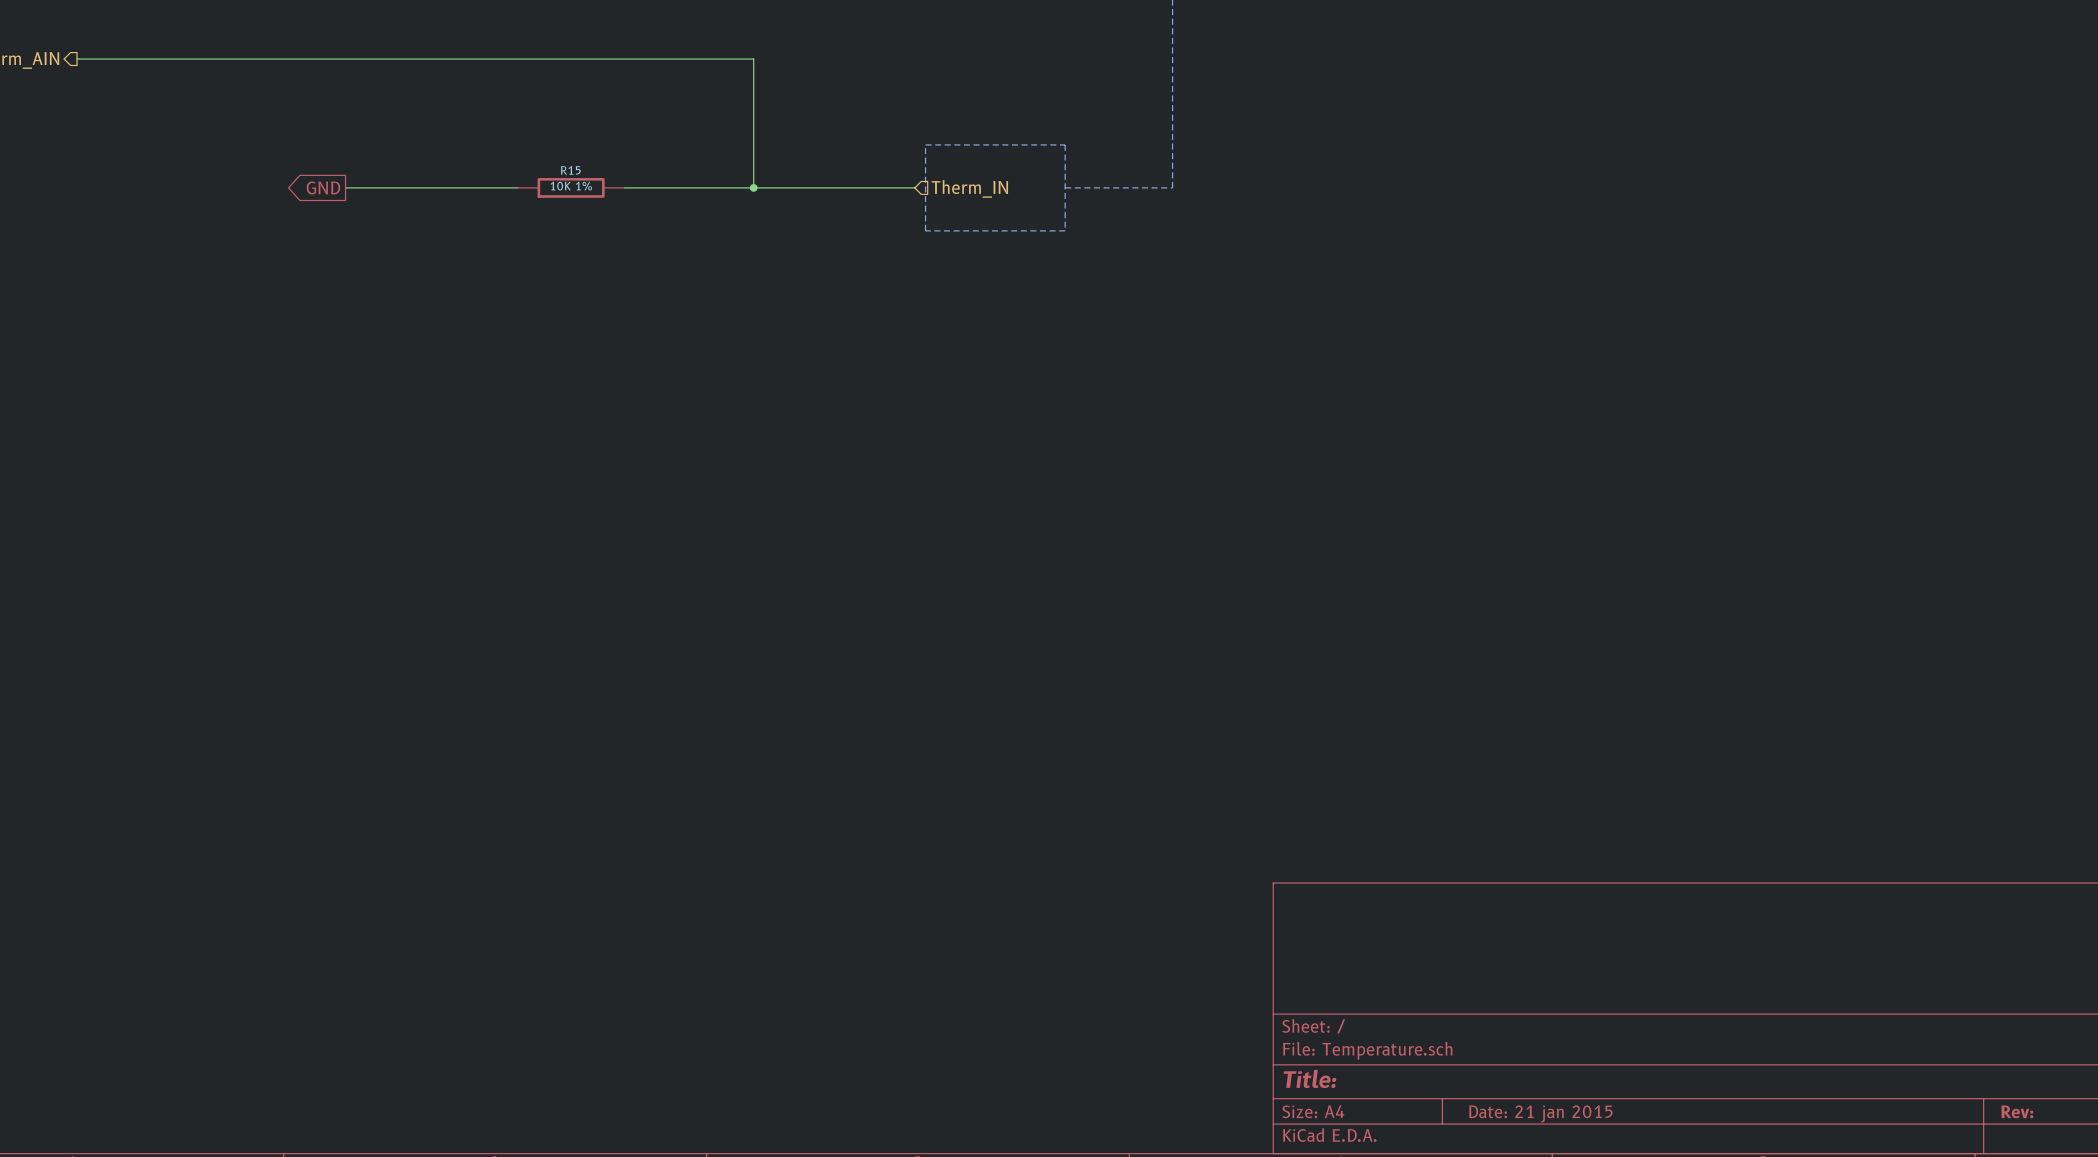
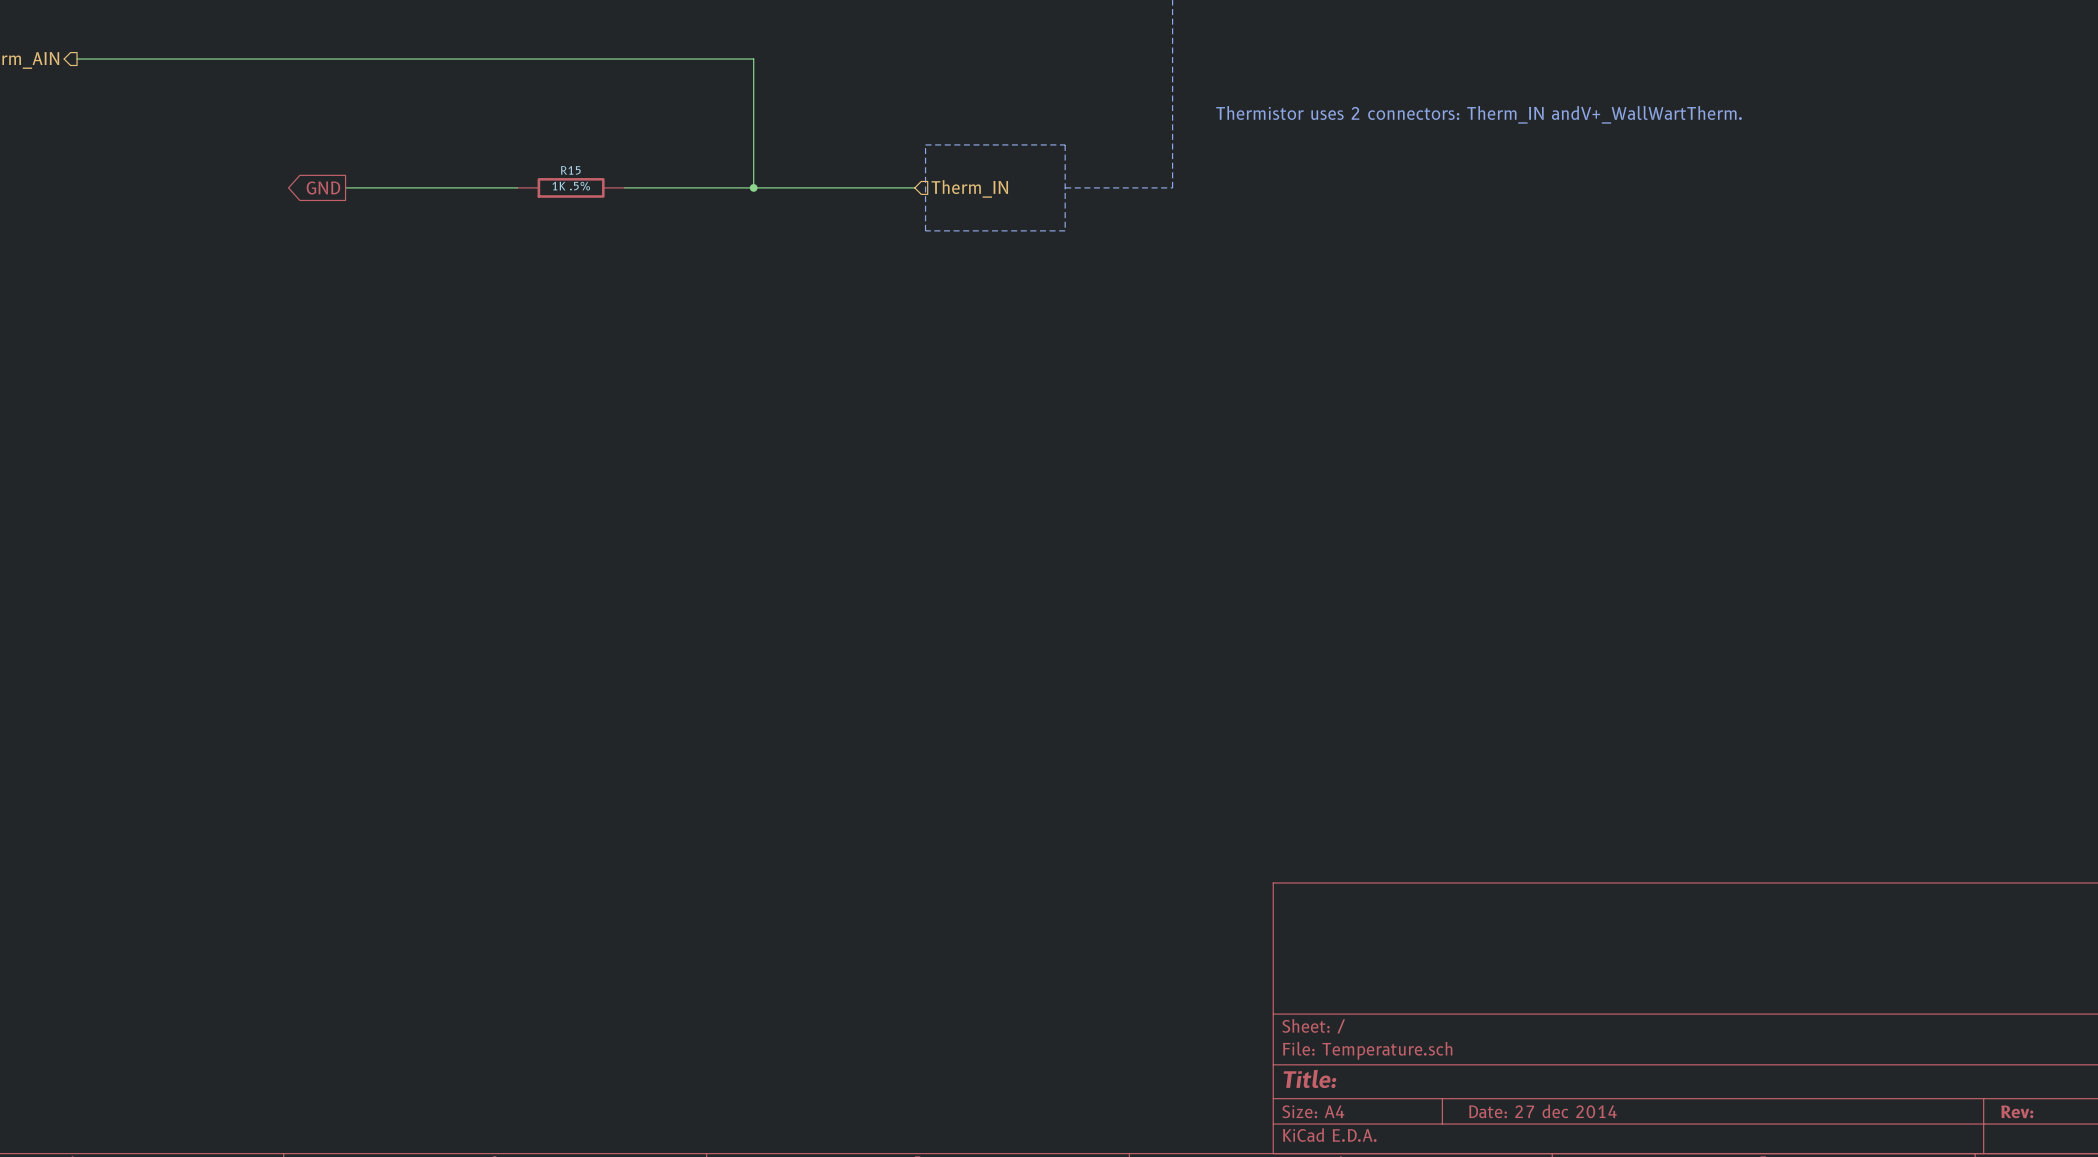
text: none -> Thermistor uses 2 connectors: Therm_IN andV+_WallWartTherm. (1479, 114)
R15 value: 10K 1% (571, 186) -> 1K .5% (571, 186)
title block: Date: 21 jan 2015 (1540, 1113) -> Date: 27 dec 2014 (1542, 1111)

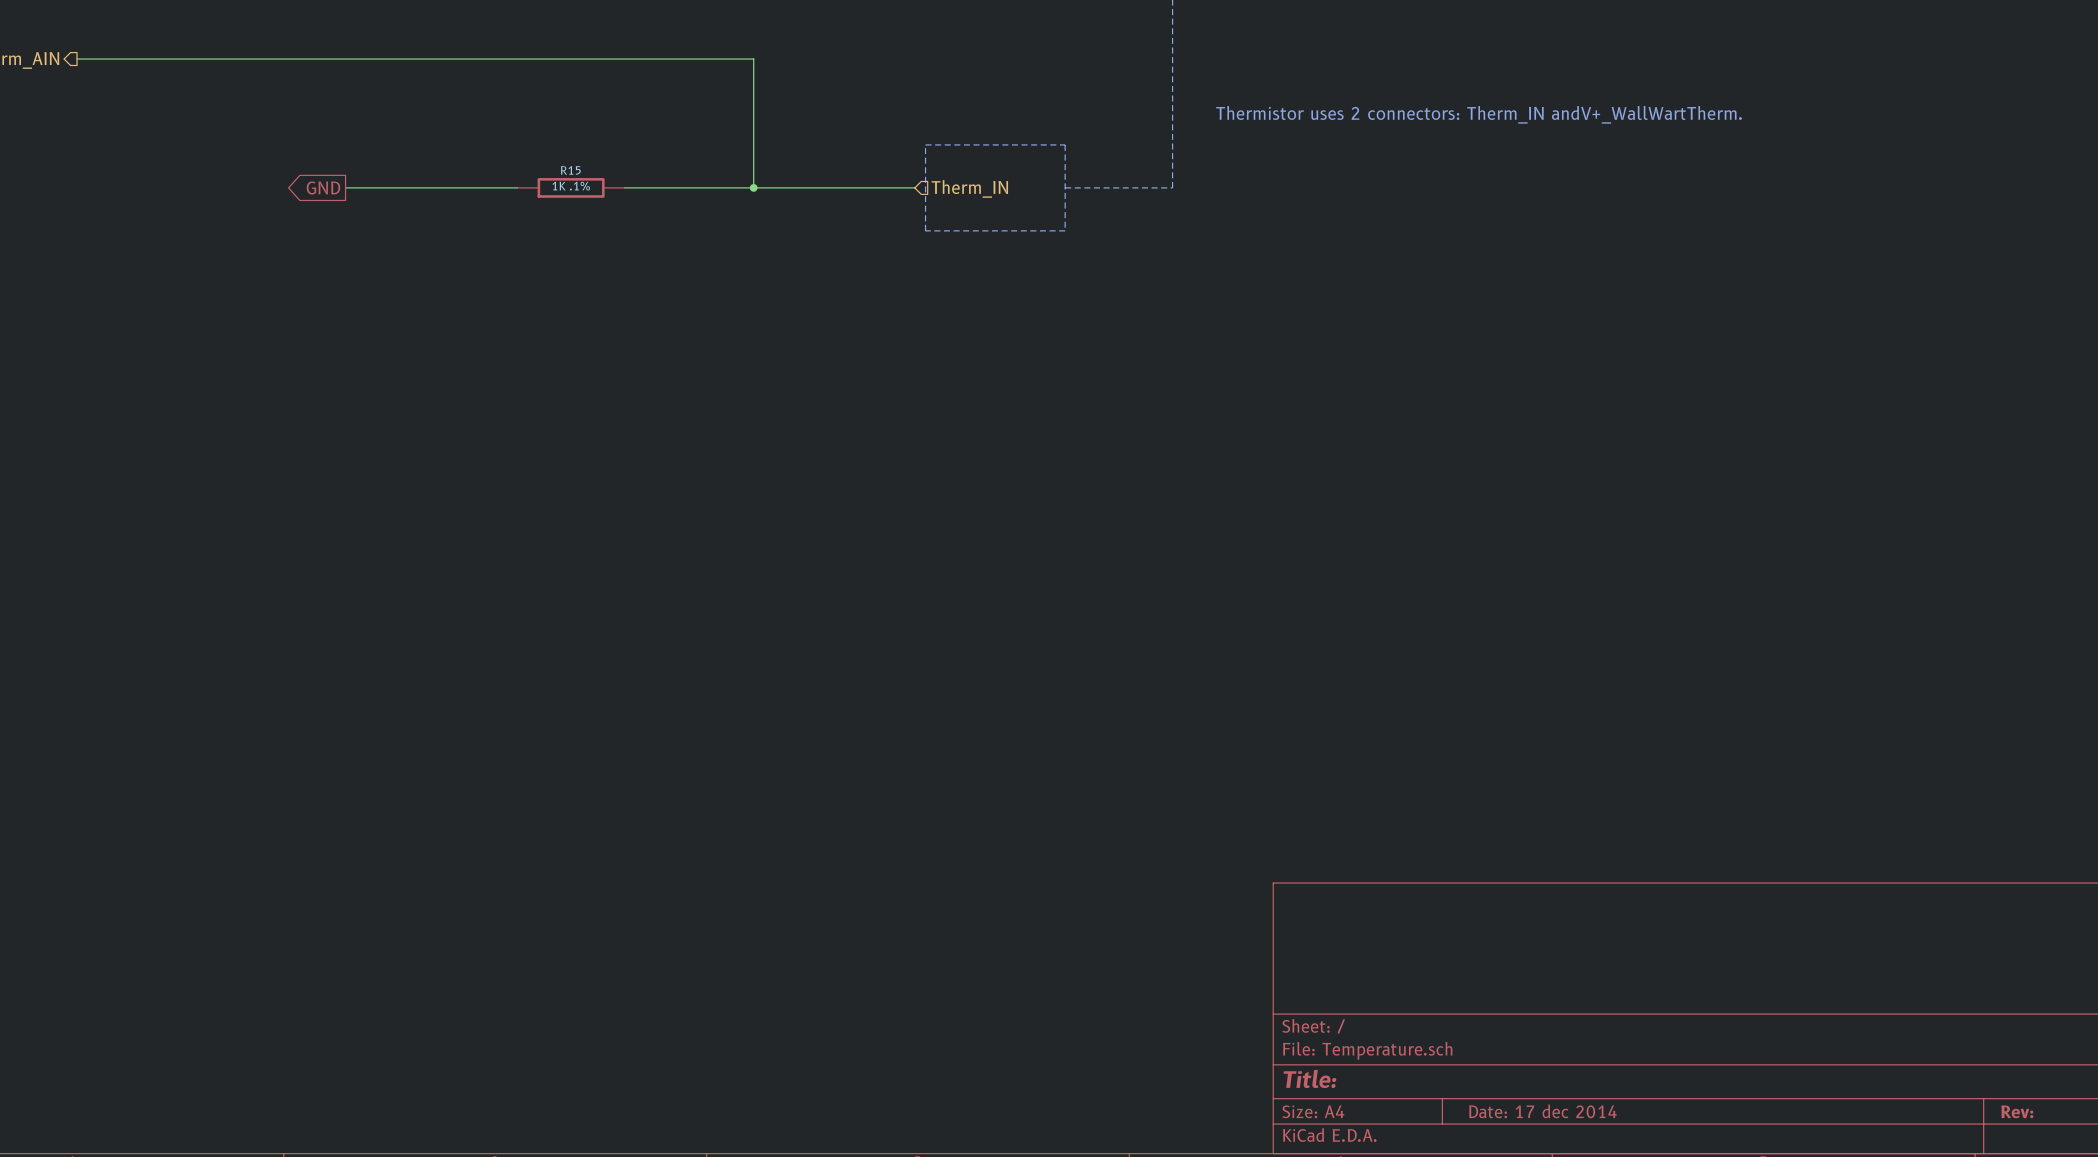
R15 value: 1K .5% (571, 186) -> 1K .1% (571, 186)
title block: Date: 27 dec 2014 (1542, 1111) -> Date: 17 dec 2014 (1542, 1111)

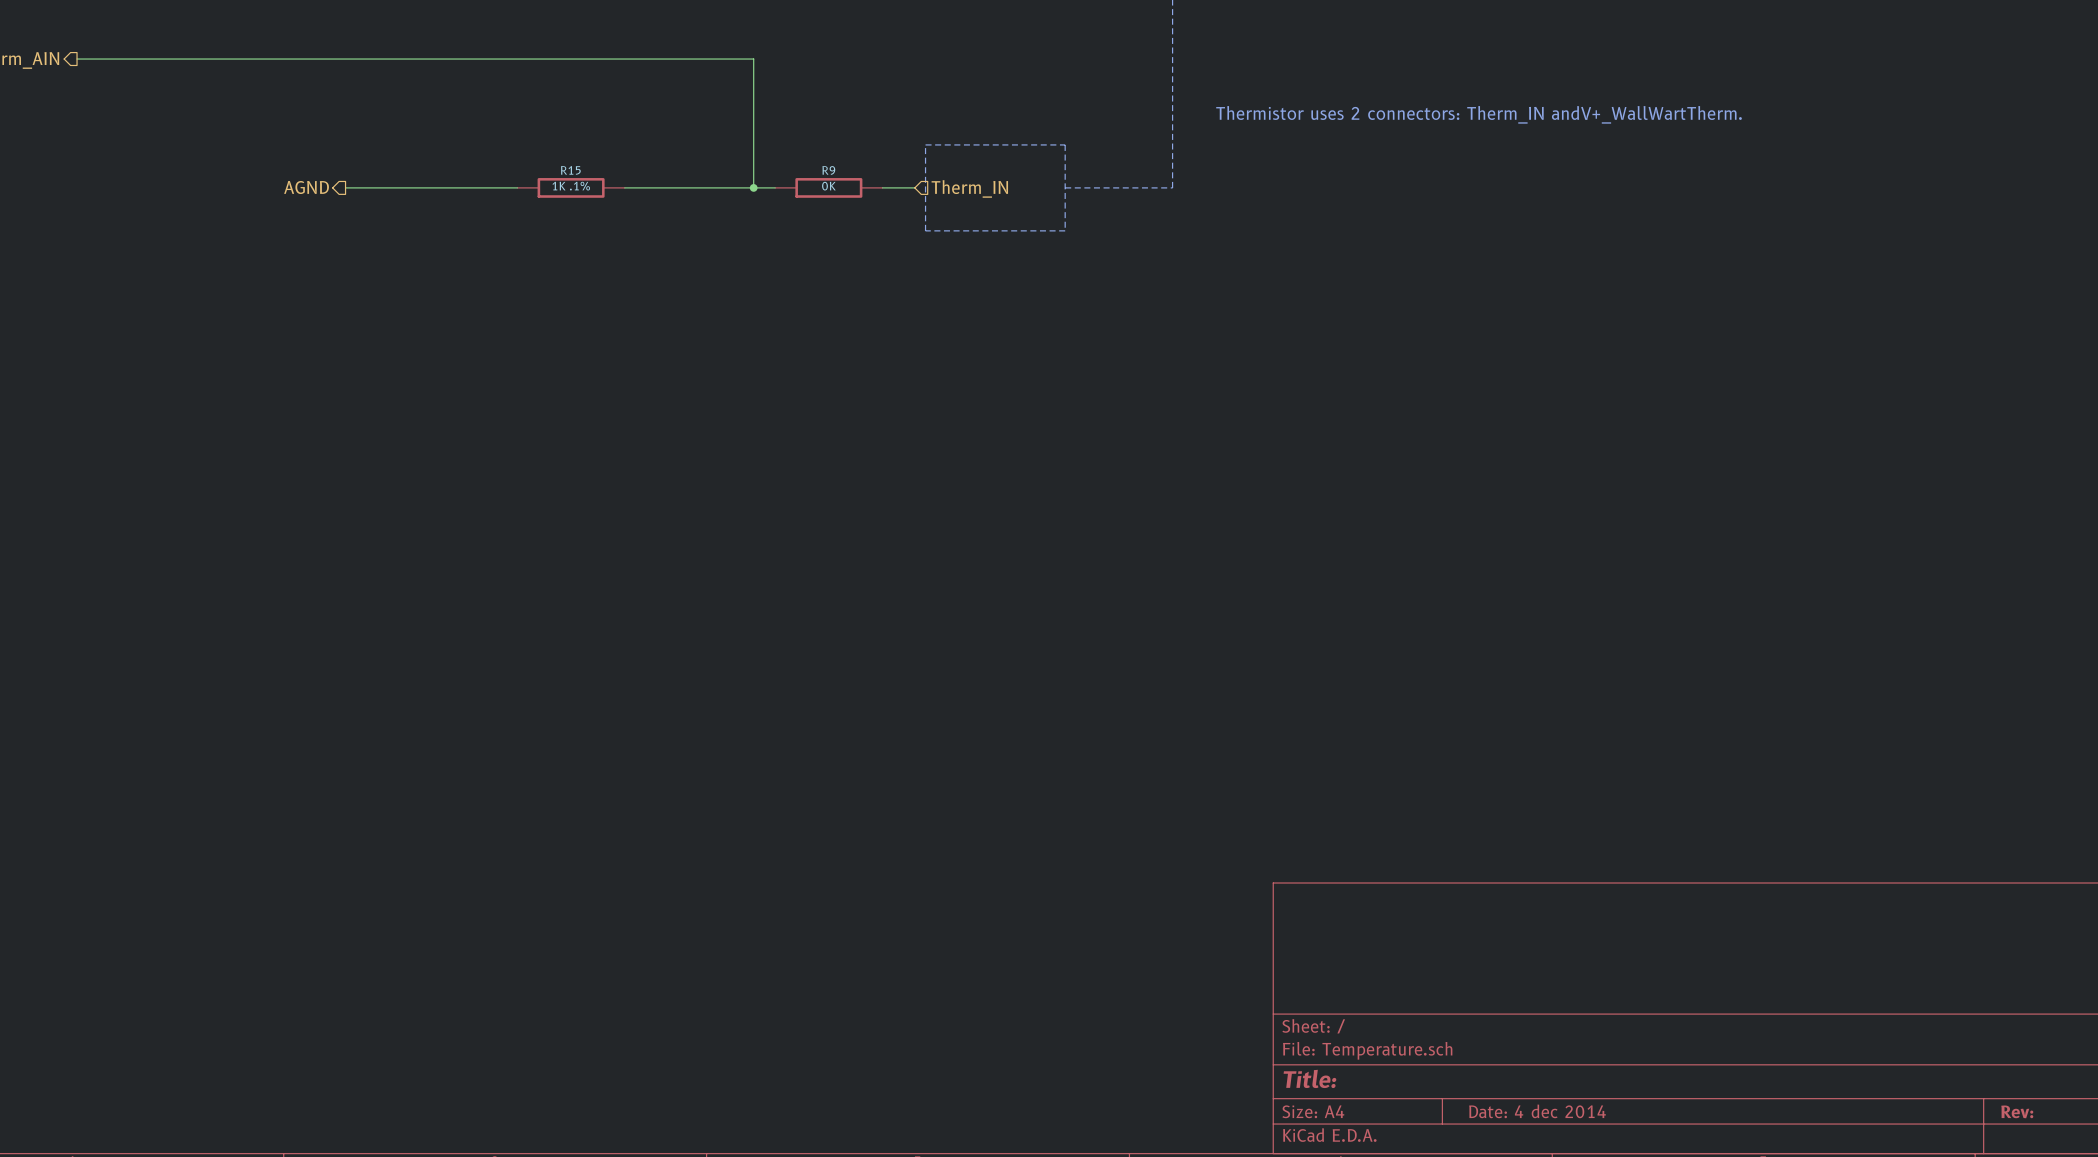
hierarchical label: none -> AGND (306, 187)
global label: GND (323, 187) -> none
wire: (775, 187) (882, 187) -> none
R9: none -> 0K (828, 187)
title block: Date: 17 dec 2014 (1542, 1111) -> Date: 4 dec 2014 (1537, 1111)

